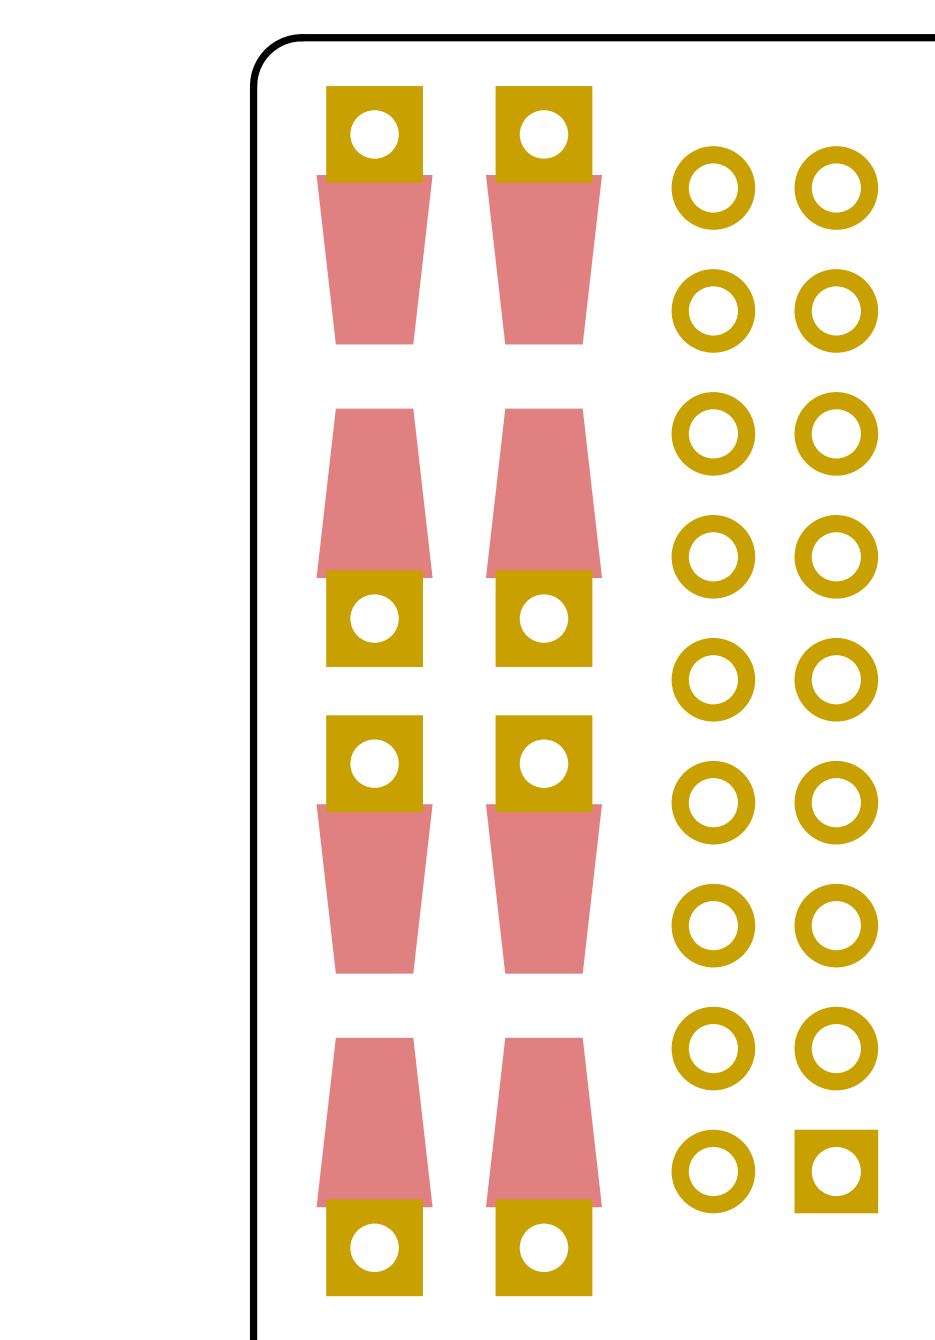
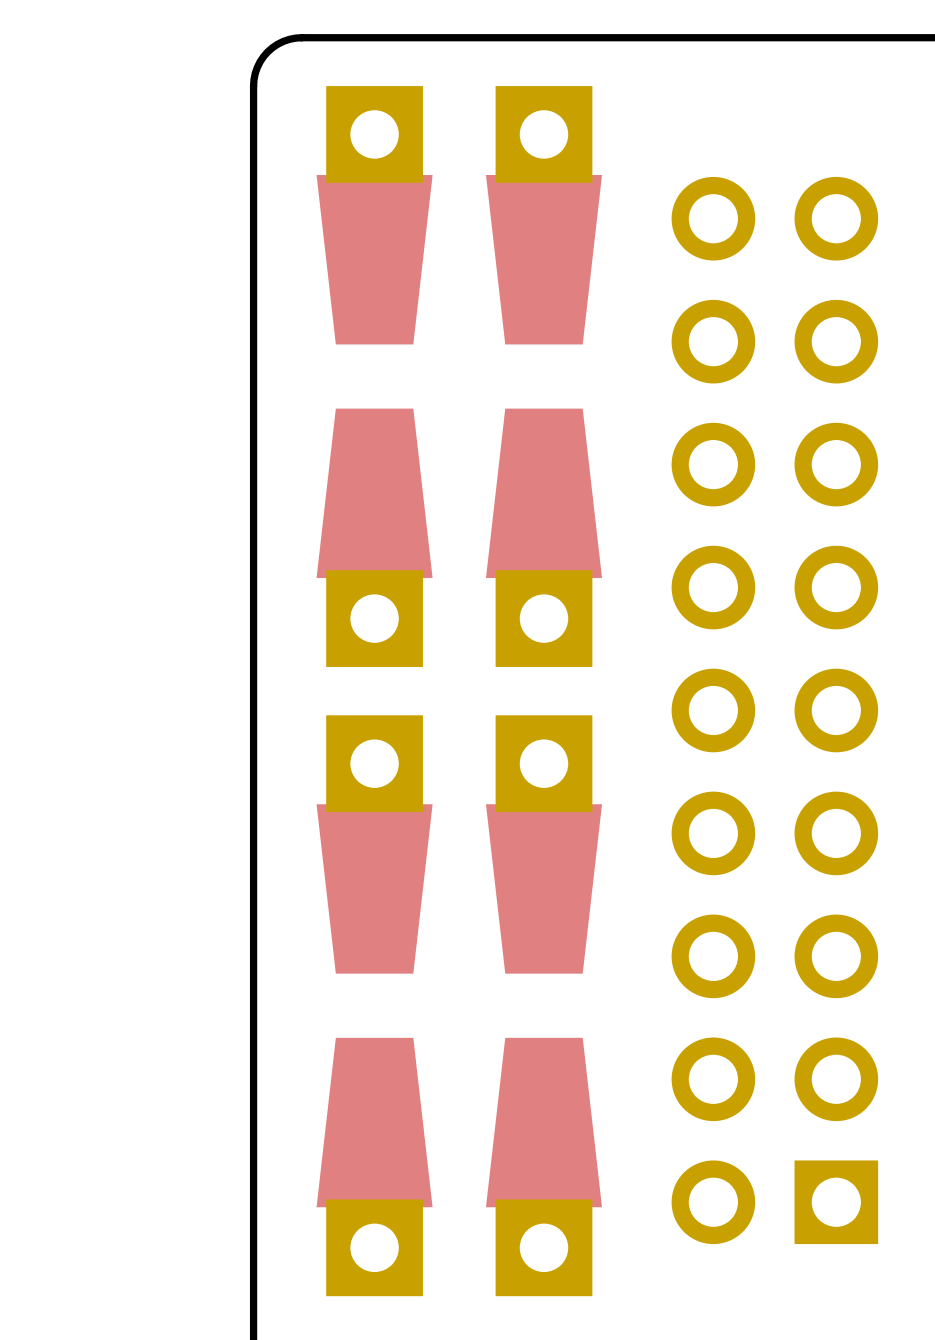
part position: (774, 679) -> (774, 710)

